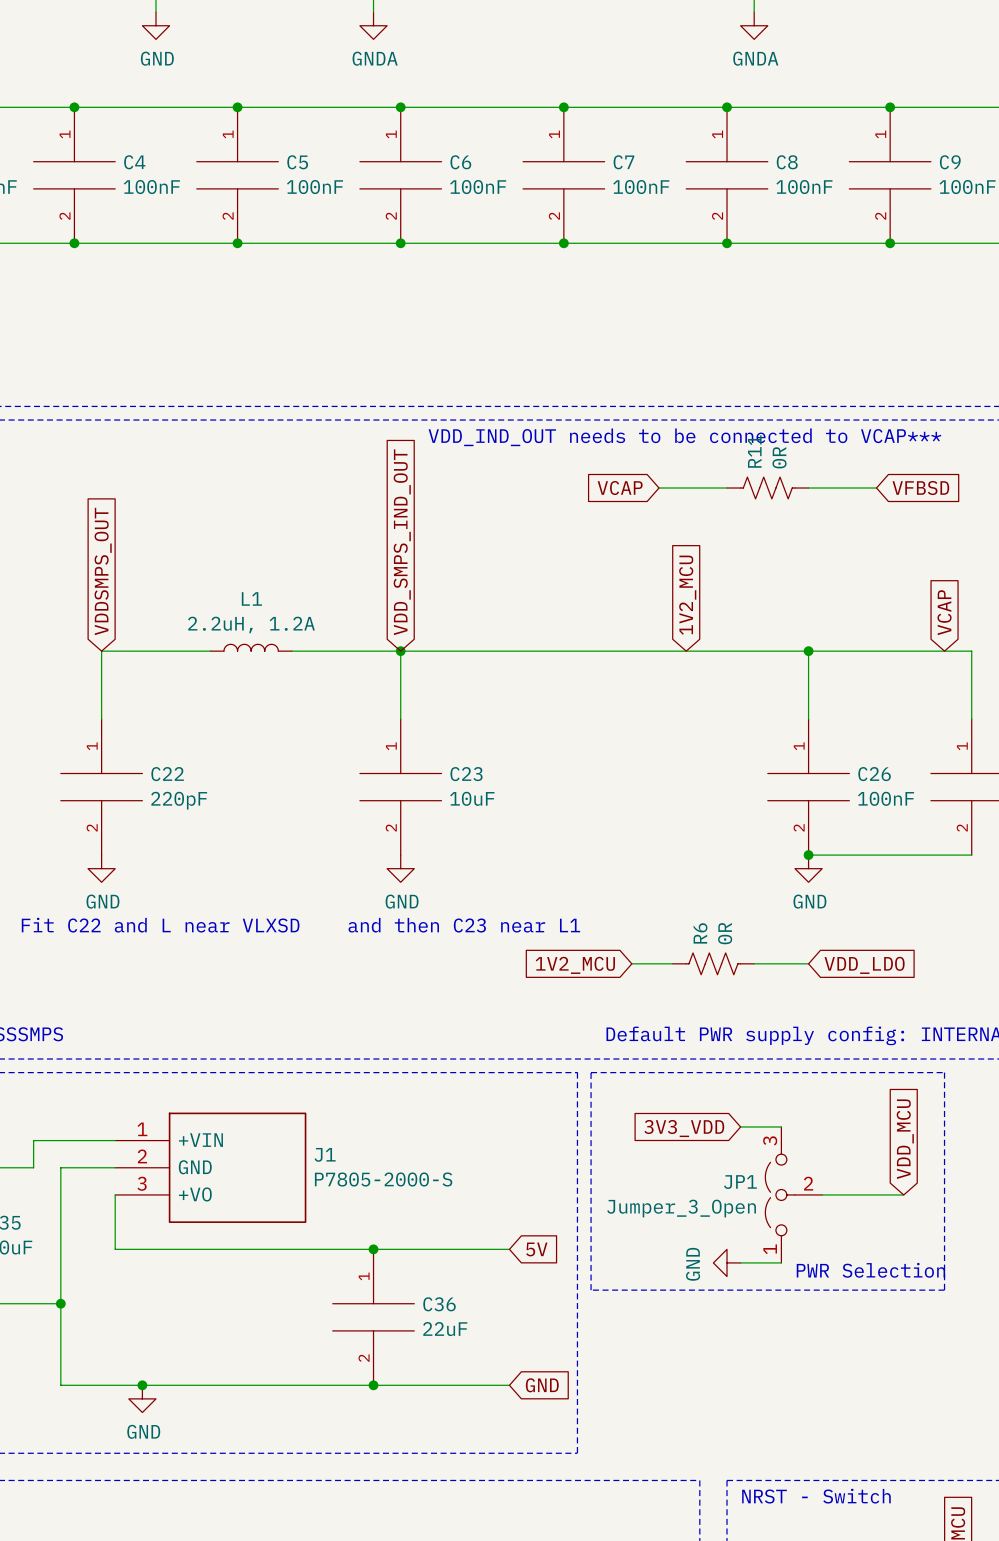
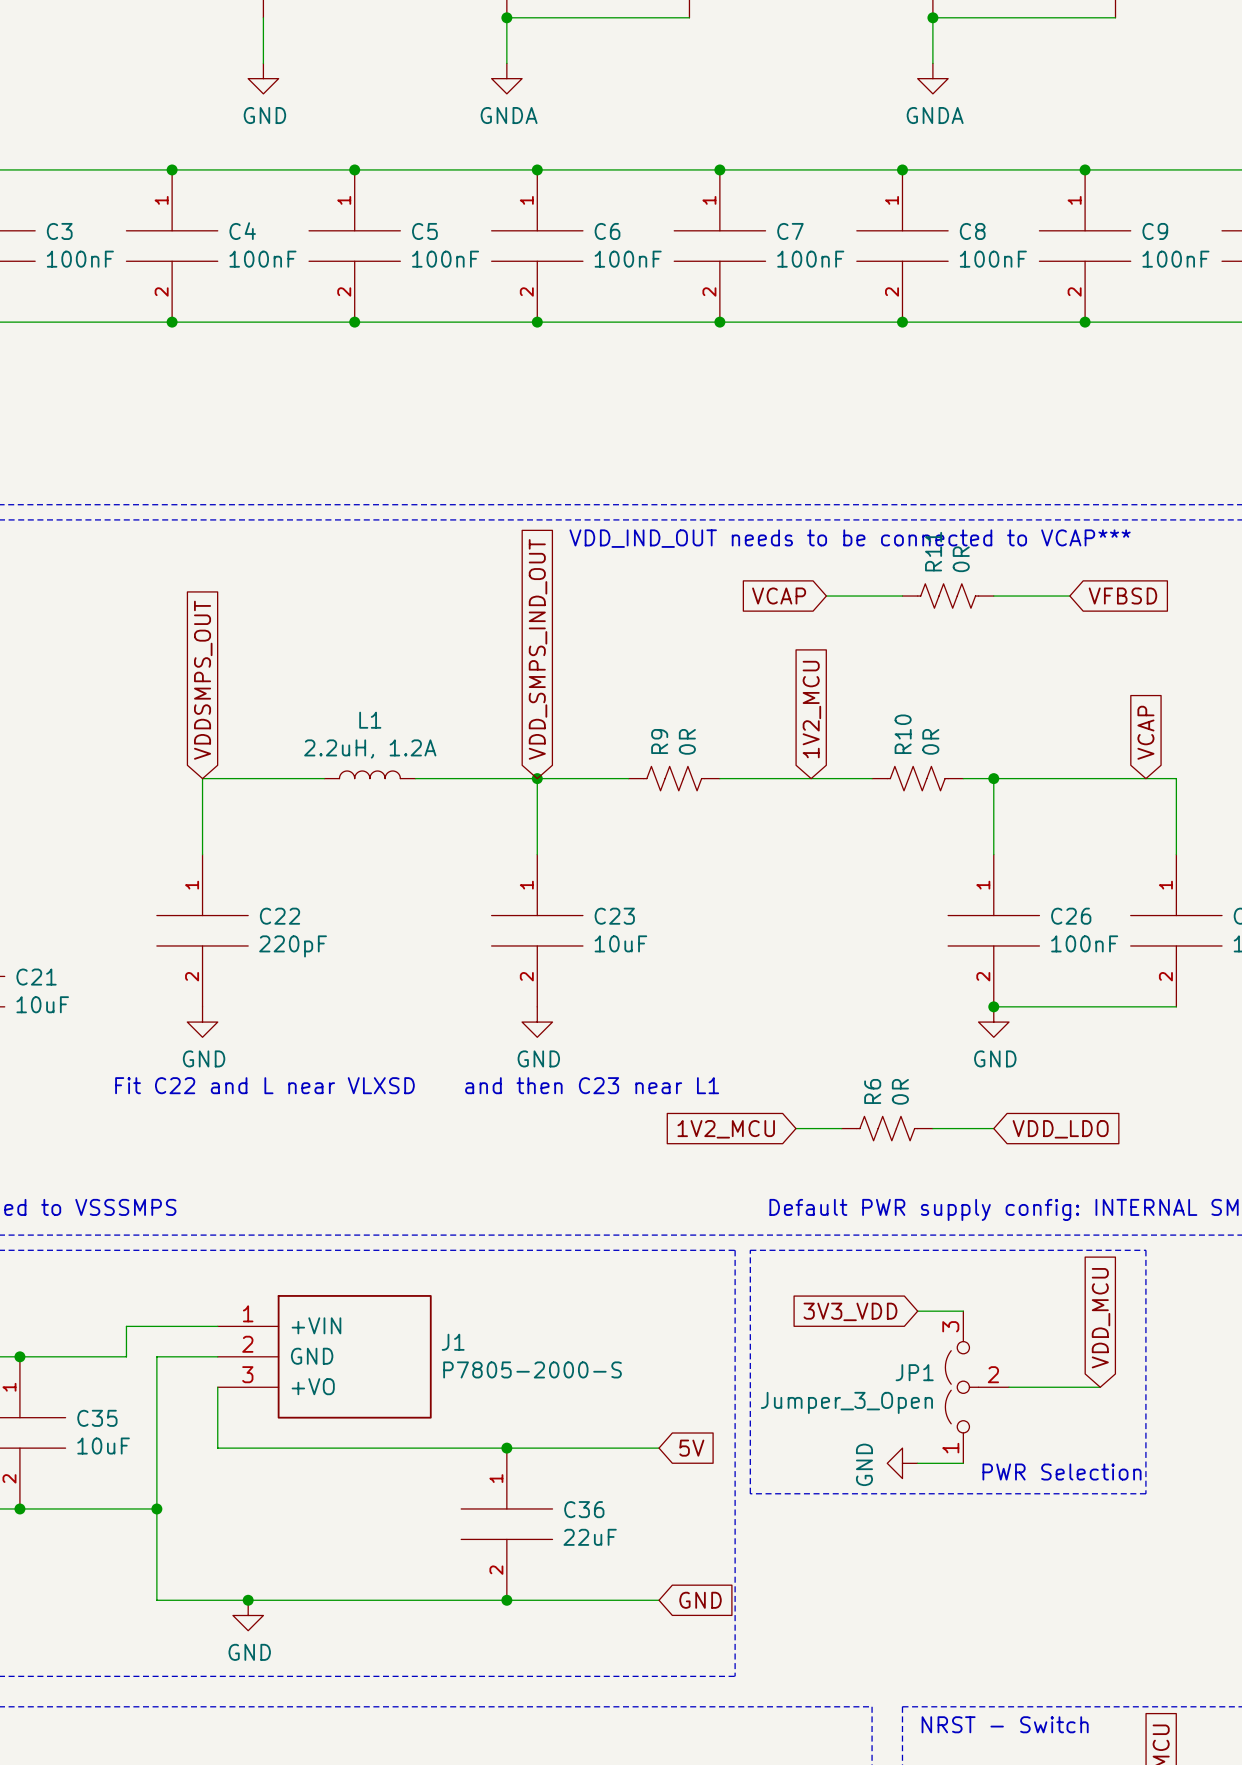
global label position: 1V2_MCU (687, 595) -> 1V2_MCU (811, 709)
R9: none -> 0R (674, 778)
R10: none -> 0R (917, 778)

